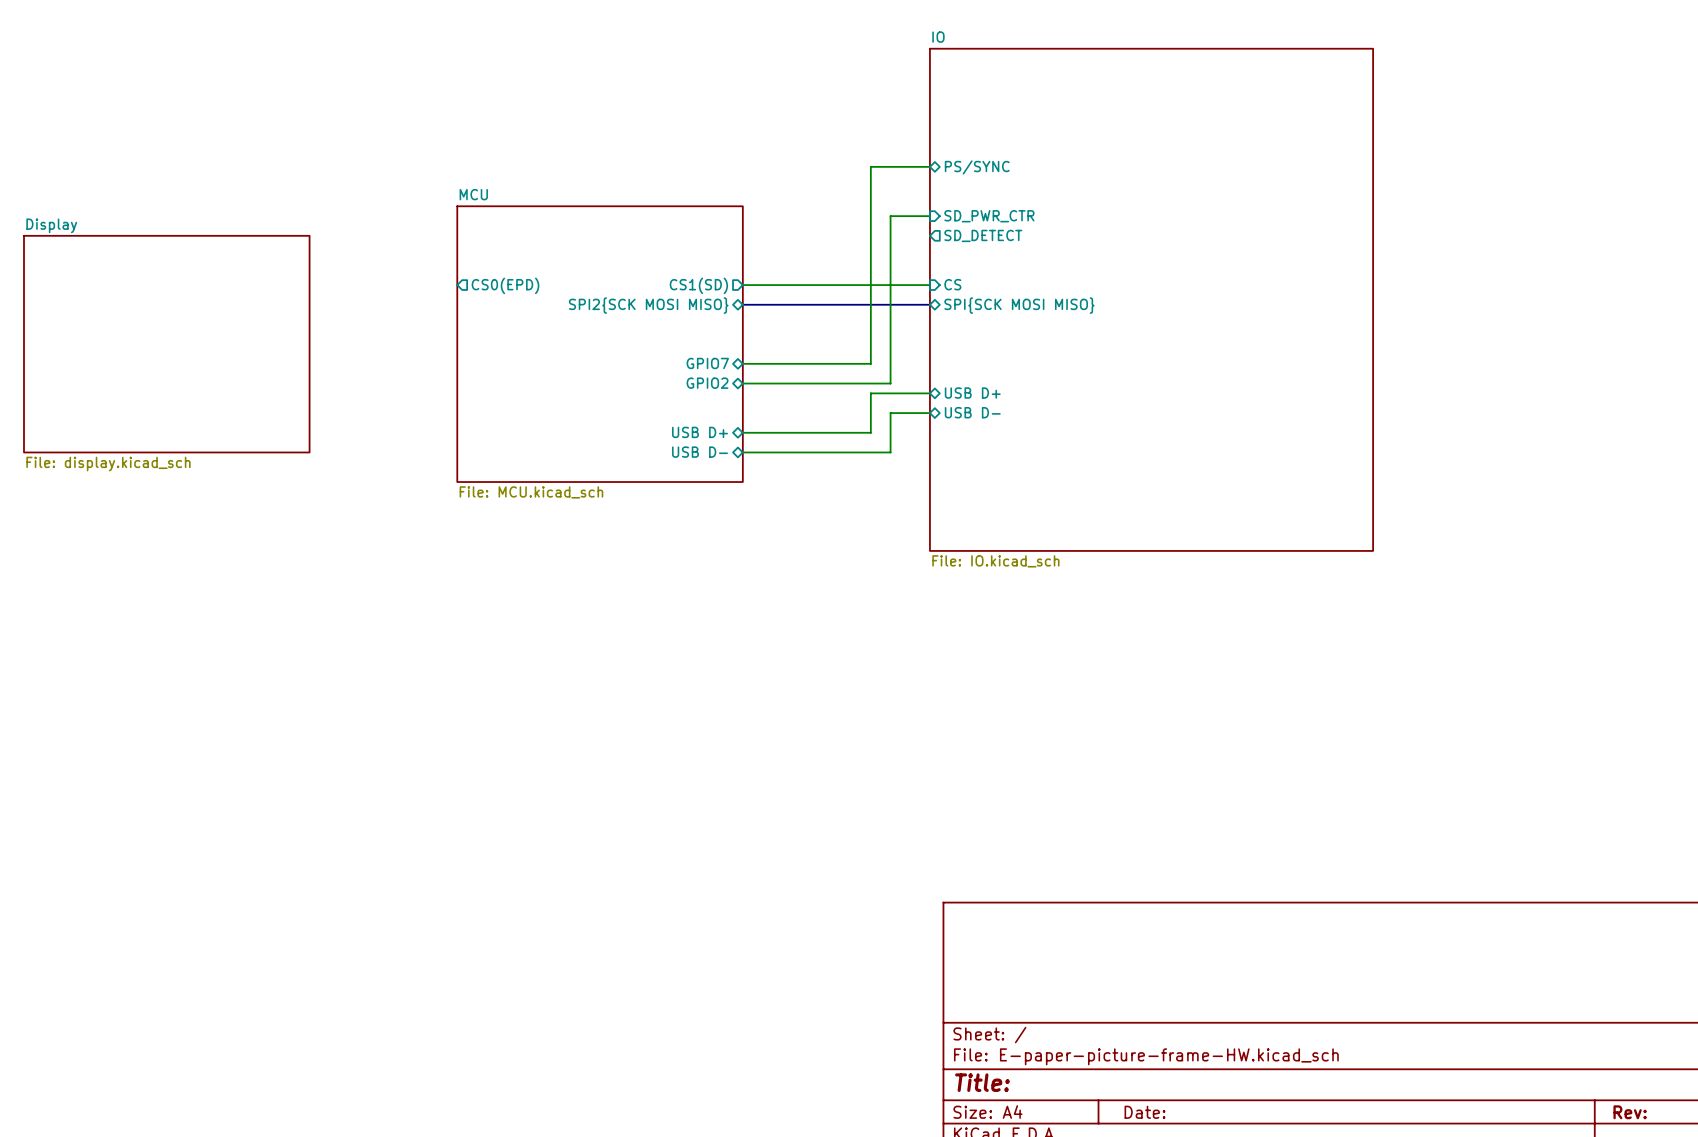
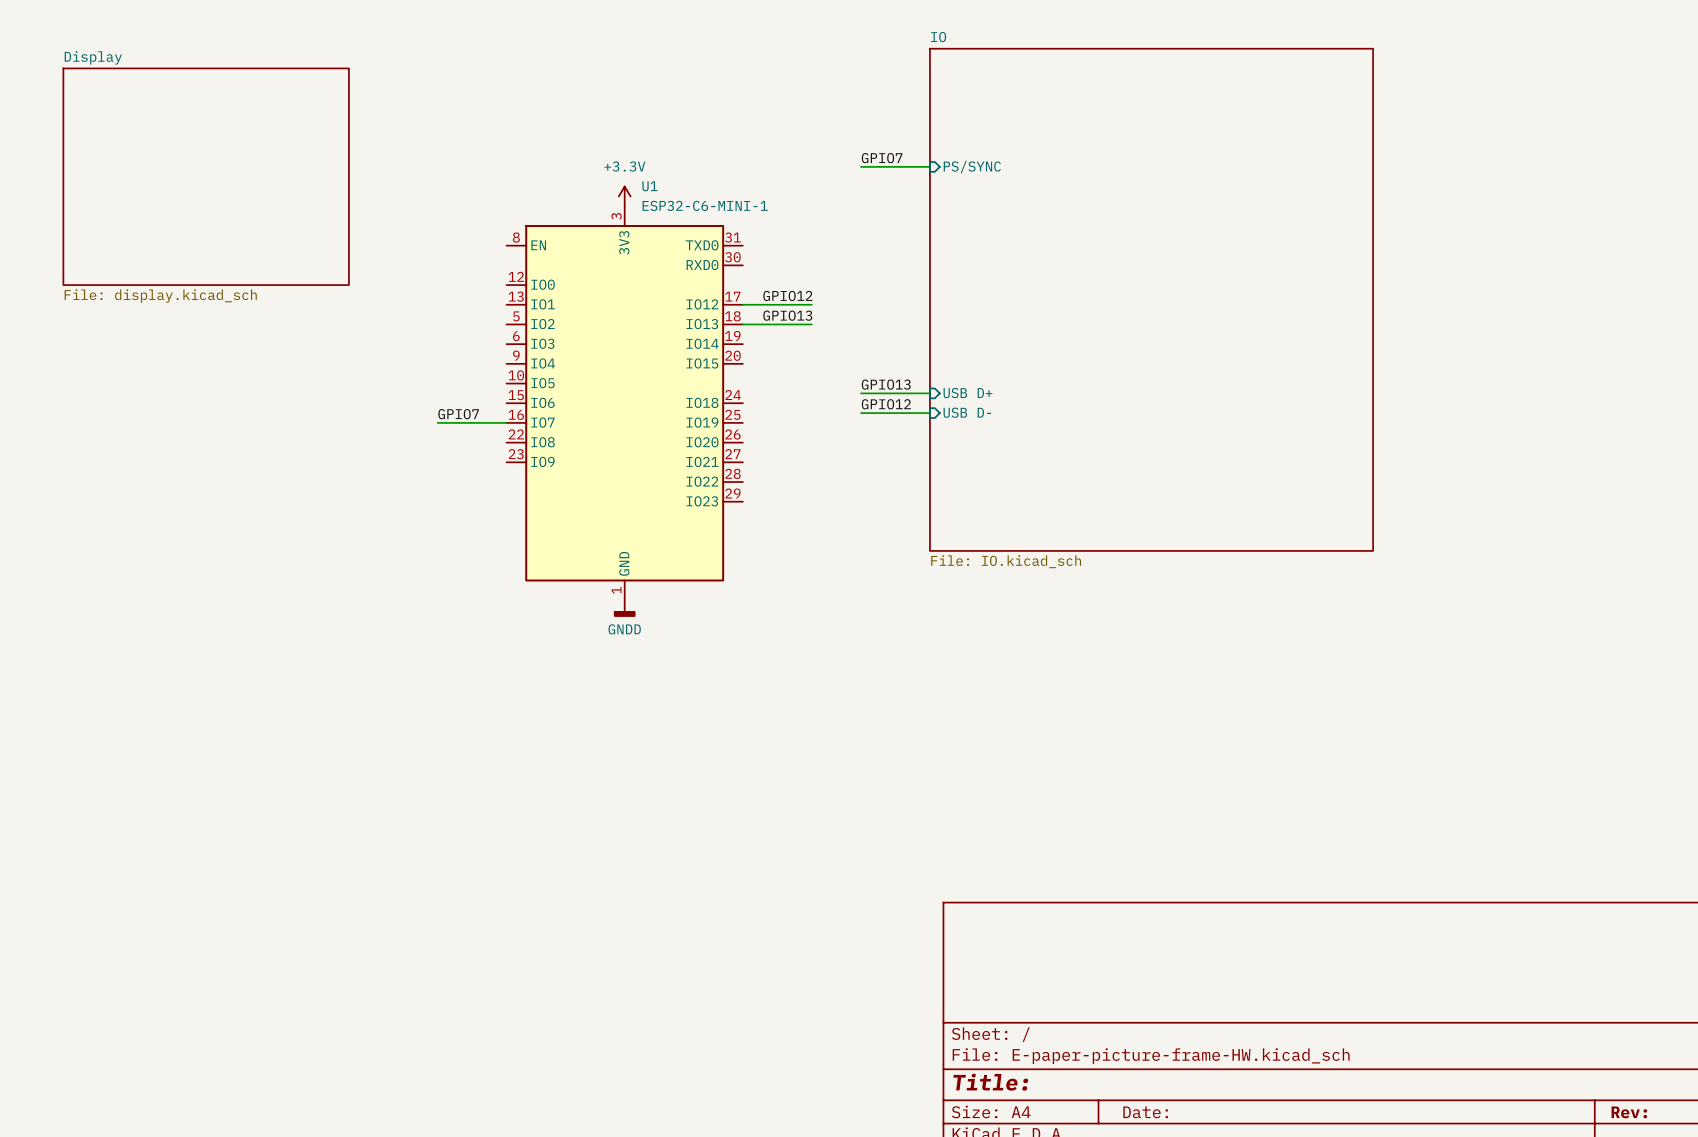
label: none -> GPIO7 (882, 158)
wire: (870, 166) (870, 363) (742, 363) -> (870, 166) (861, 166)
sheet pin shape: bidirectional (977, 167) -> input (972, 167)
power symbol: none -> +3.3V (624, 196)
wire: (929, 216) (890, 216) (890, 383) (742, 383) -> none
sheet pin: SD_PWR_CTR (989, 216) -> none
sheet pin: SD_DETECT (983, 235) -> none
sheet pin: CS (952, 284) -> none
sheet pin: CS0(EPD) (505, 285) -> none
sheet pin: CS1(SD) (698, 285) -> none
wire: (742, 285) (929, 285) -> none
label: none -> GPIO12 (787, 295)
bus: (742, 304) (929, 304) -> none
sheet pin: SPI2{SCK MOSI MISO} (648, 305) -> none
sheet pin: SPI{SCK MOSI MISO} (1019, 305) -> none
label: none -> GPIO13 (787, 315)
wire: none -> (742, 324) (811, 324)
sheet Display position: (166, 344) -> (206, 176)
sheet MCU: File: MCU.kicad_sch (600, 344) -> none
sheet pin: GPIO7 (707, 363) -> none
sheet pin: GPIO2 (707, 383) -> none
label: none -> GPIO13 (886, 384)
wire: (870, 393) (870, 432) (742, 432) -> (870, 393) (861, 393)
sheet pin shape: bidirectional (972, 393) -> input (967, 393)
U1: none -> ESP32-C6-MINI-1 (624, 403)
label: none -> GPIO12 (886, 404)
sheet pin shape: bidirectional (972, 412) -> input (967, 412)
wire: (890, 413) (890, 452) (742, 452) -> (890, 413) (861, 413)
label: none -> GPIO7 (458, 414)
wire: none -> (437, 422) (506, 422)
sheet pin: USB D+ (700, 432) -> none
sheet pin: USB D- (700, 452) -> none
power symbol: none -> GNDD (624, 608)

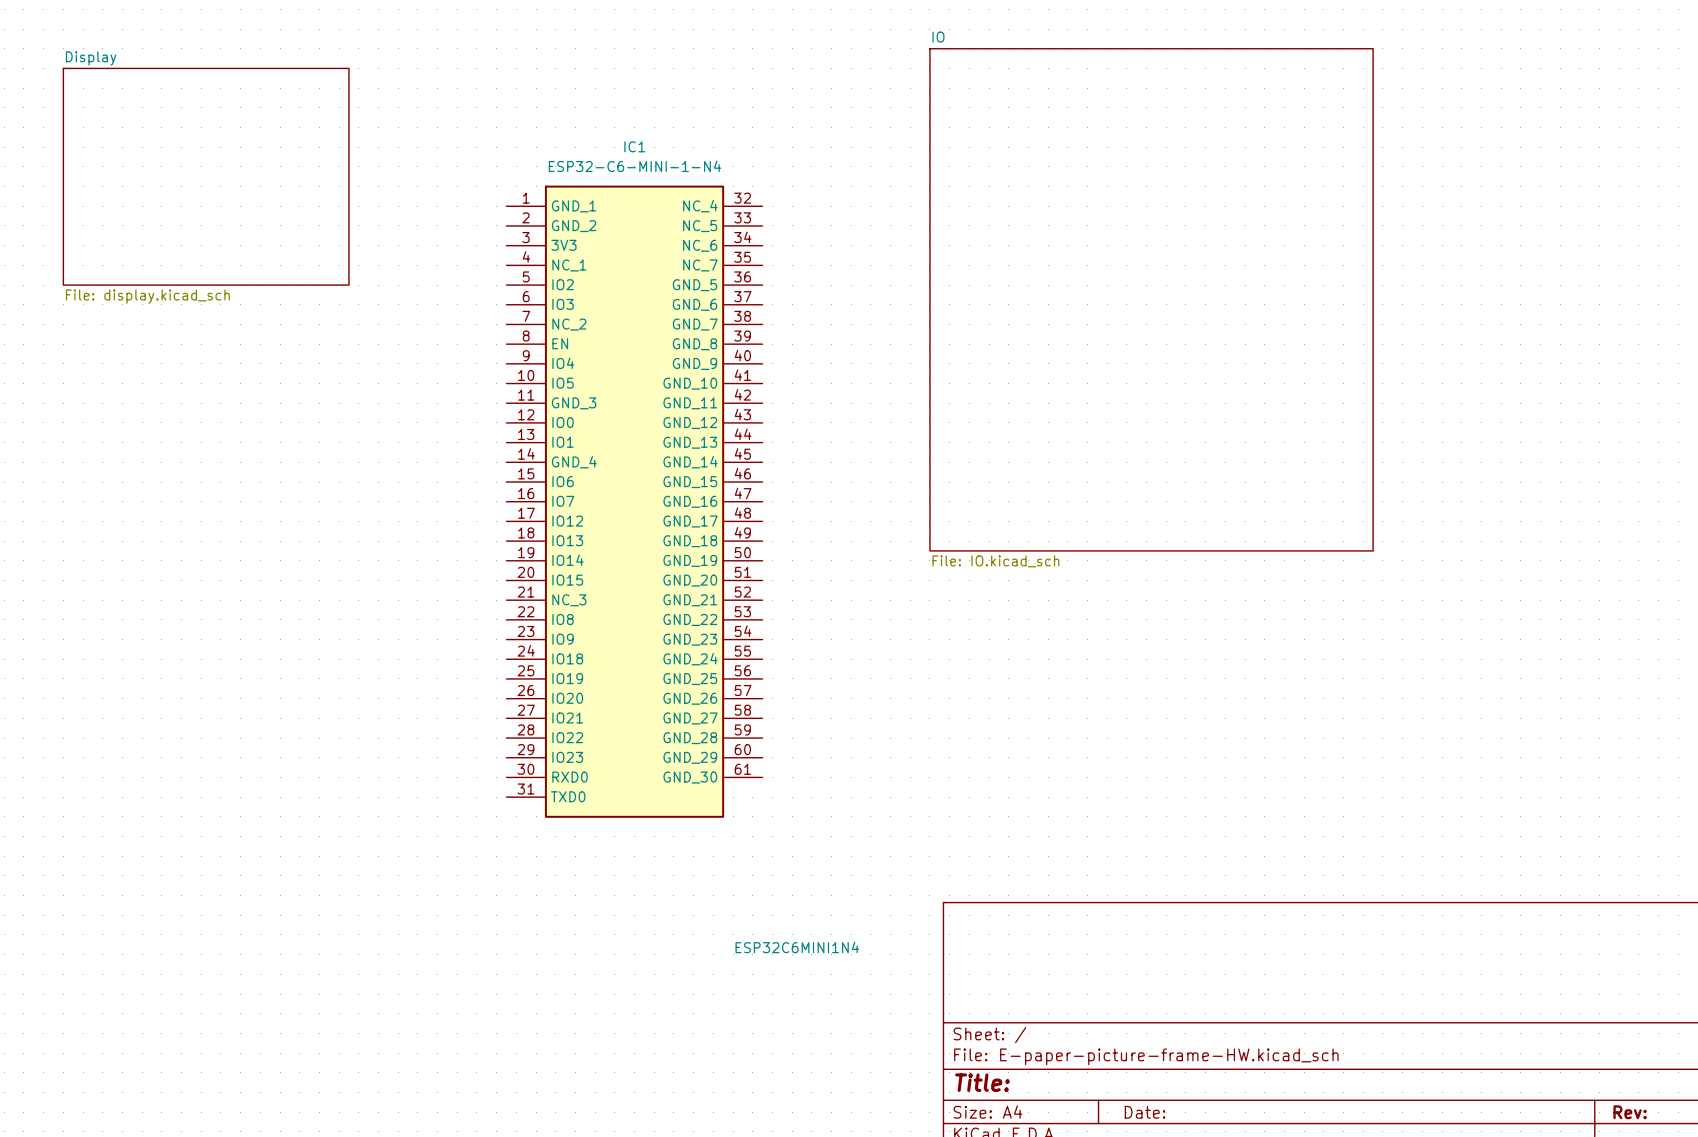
label: GPIO7 (882, 158) -> none
wire: (861, 166) (929, 166) -> none
sheet pin: PS/SYNC (972, 167) -> none
power symbol: +3.3V (624, 196) -> none
label: GPIO12 (787, 295) -> none
wire: (742, 304) (811, 304) -> none
label: GPIO13 (787, 315) -> none
wire: (742, 324) (811, 324) -> none
label: GPIO13 (886, 384) -> none
wire: (861, 393) (929, 393) -> none
sheet pin: USB D+ (967, 393) -> none
U1: ESP32-C6-MINI-1 (624, 403) -> none
label: GPIO12 (886, 404) -> none
sheet pin: USB D- (967, 412) -> none
wire: (861, 413) (929, 413) -> none
label: GPIO7 (458, 414) -> none
wire: (437, 422) (506, 422) -> none
IC1: none -> ESP32-C6-MINI-1-N4 (634, 501)
power symbol: GNDD (624, 608) -> none

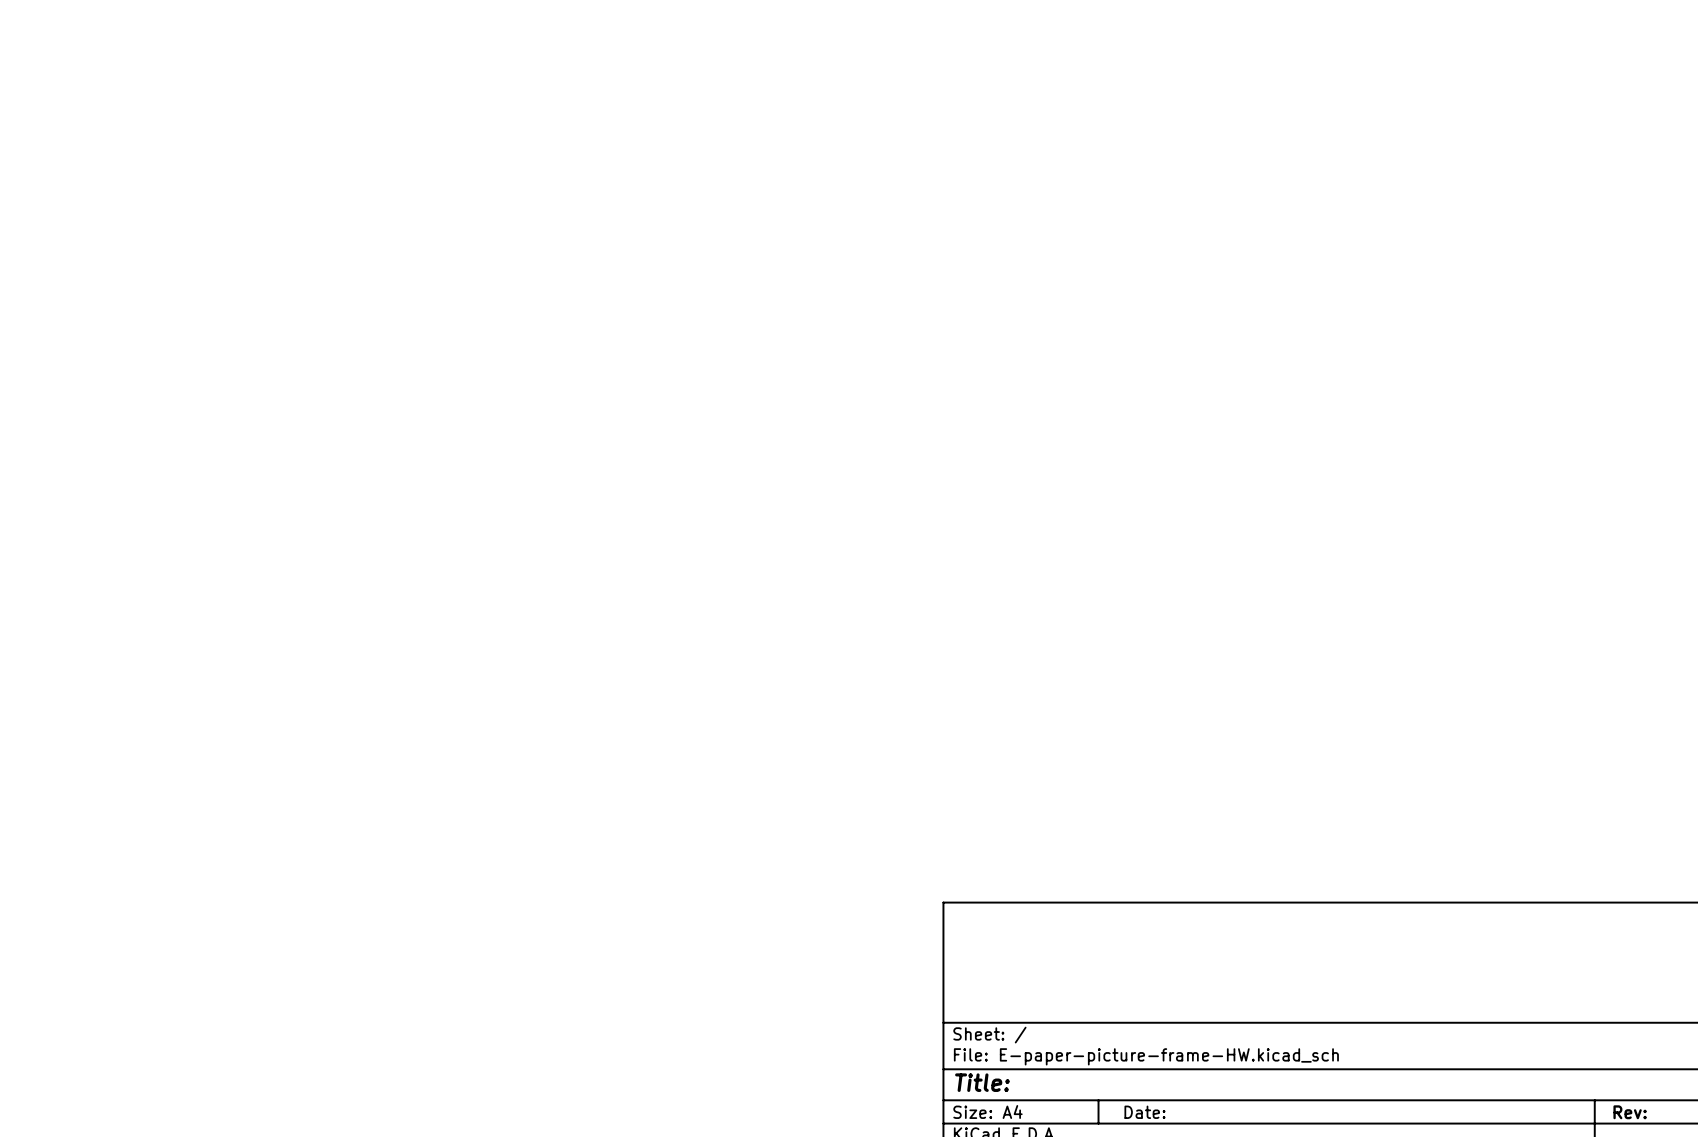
sheet Display: File: display.kicad_sch (206, 176) -> none
sheet IO: File: IO.kicad_sch (1151, 299) -> none
IC1: ESP32-C6-MINI-1-N4 (634, 501) -> none

